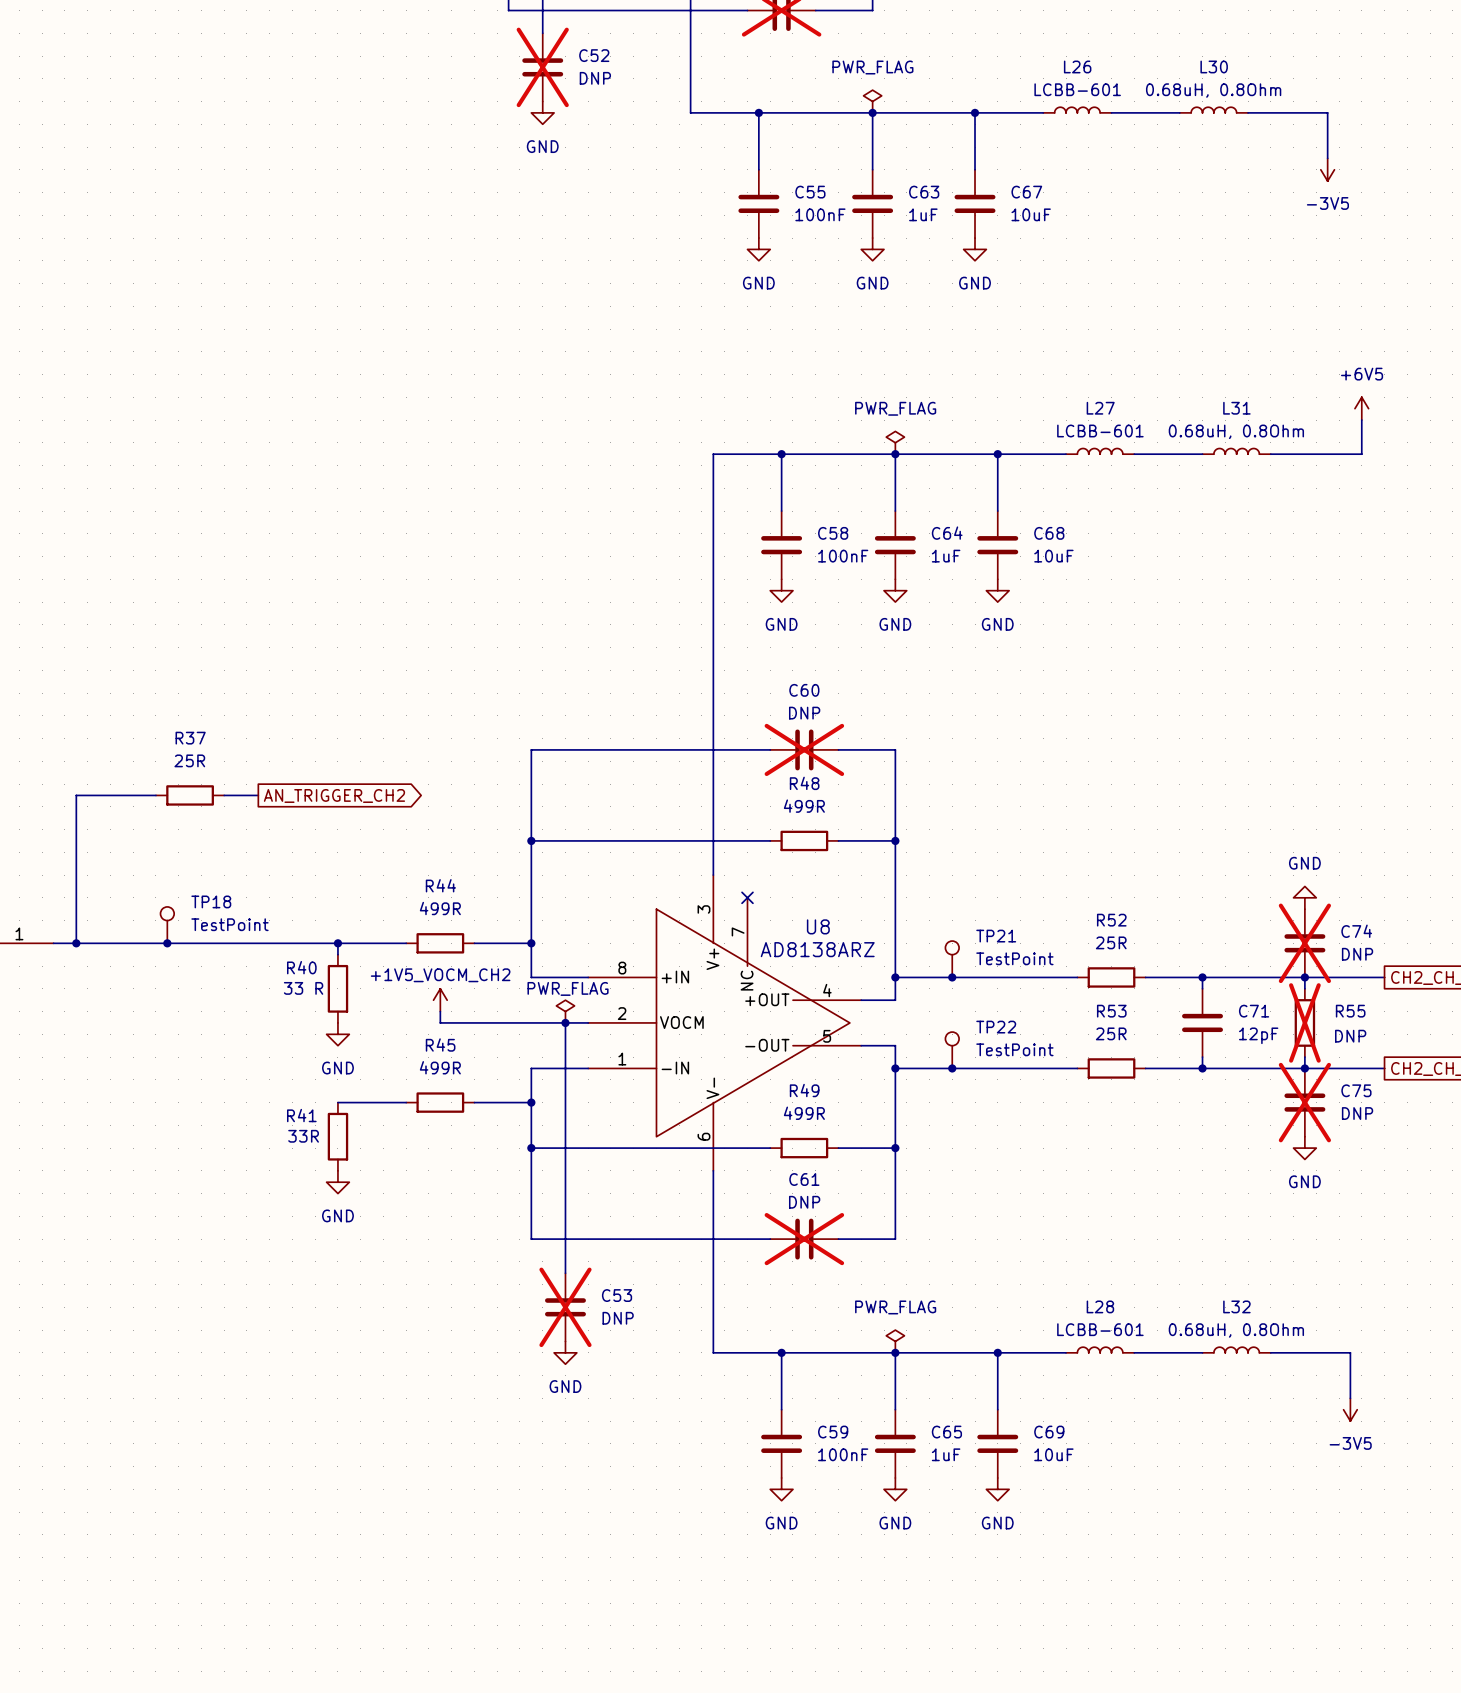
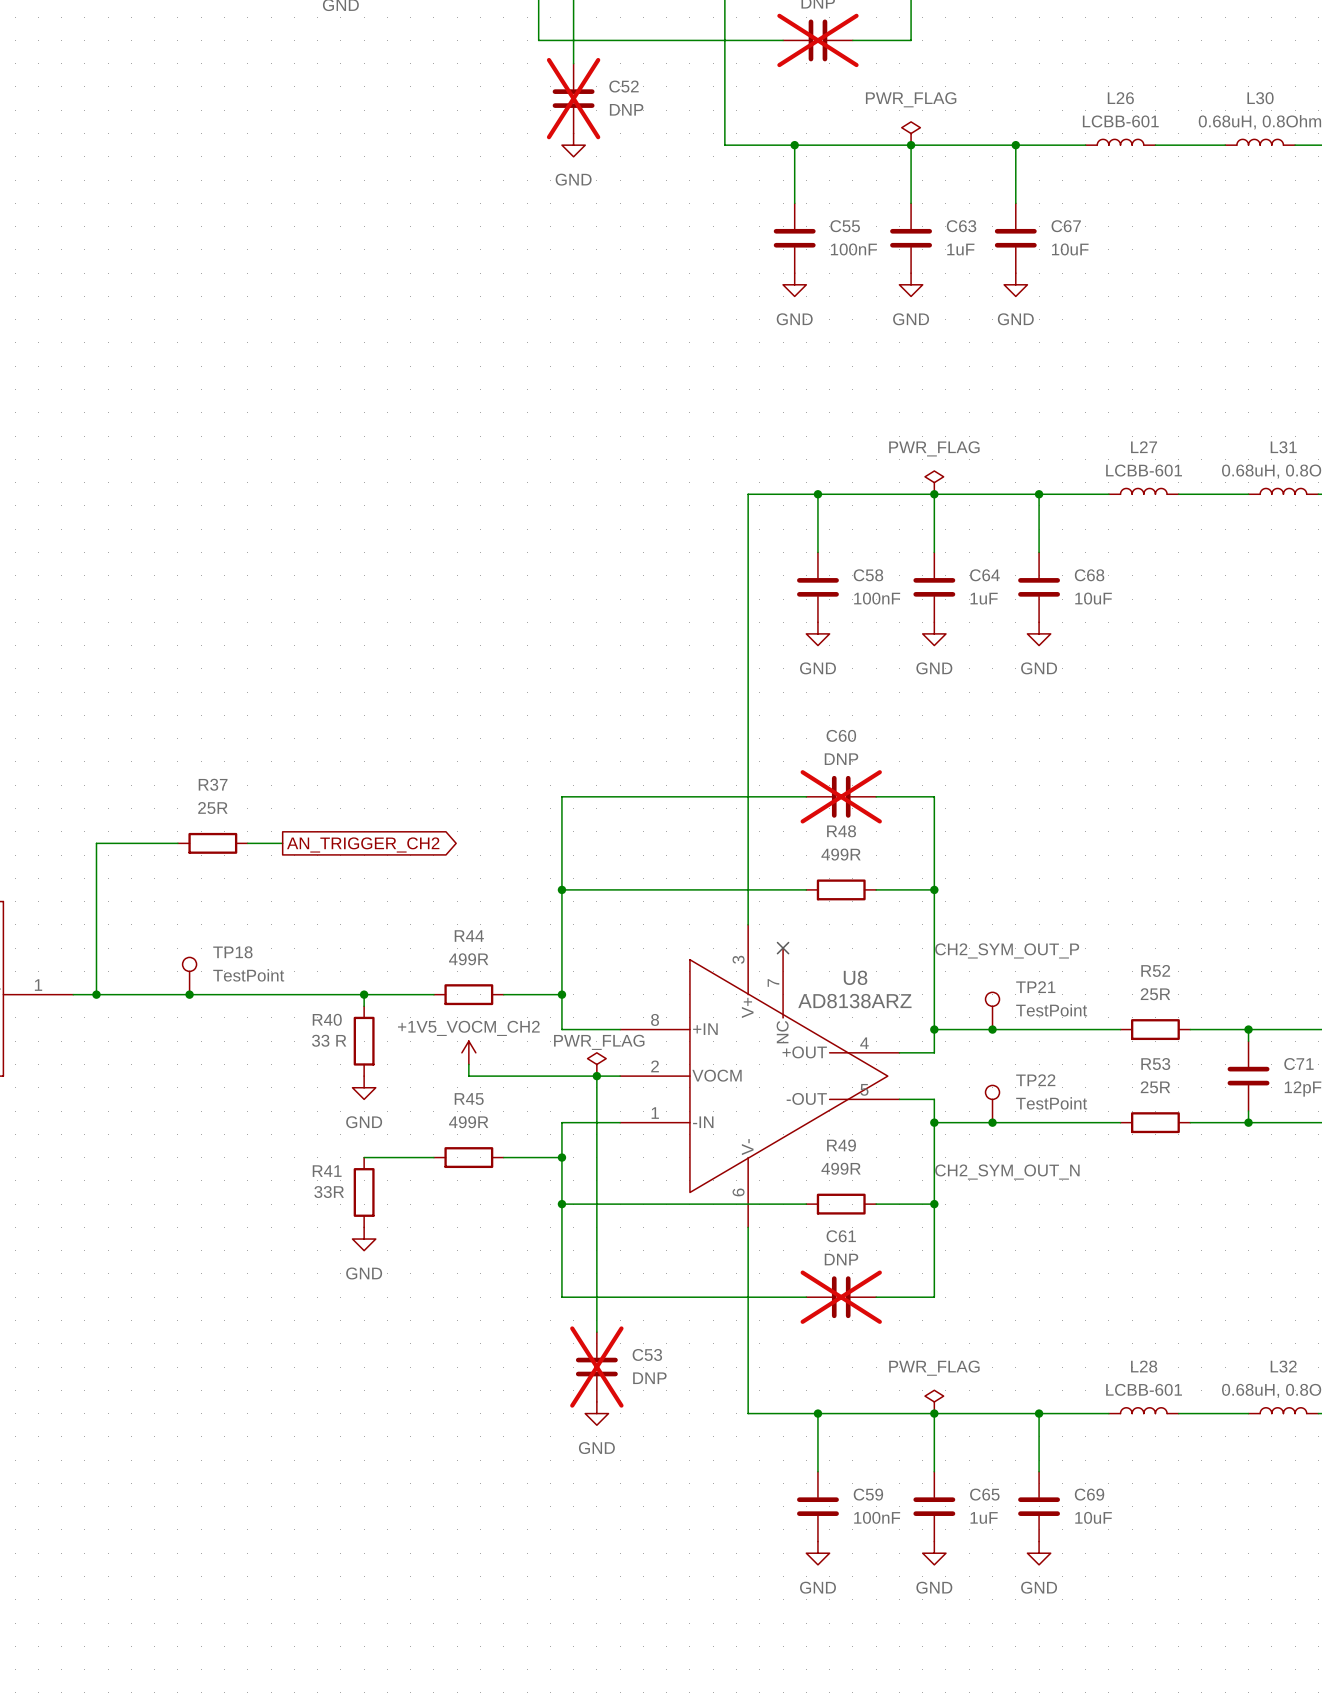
label: none -> CH2_SYM_OUT_P (1007, 950)
label: none -> CH2_SYM_OUT_N (1007, 1172)

